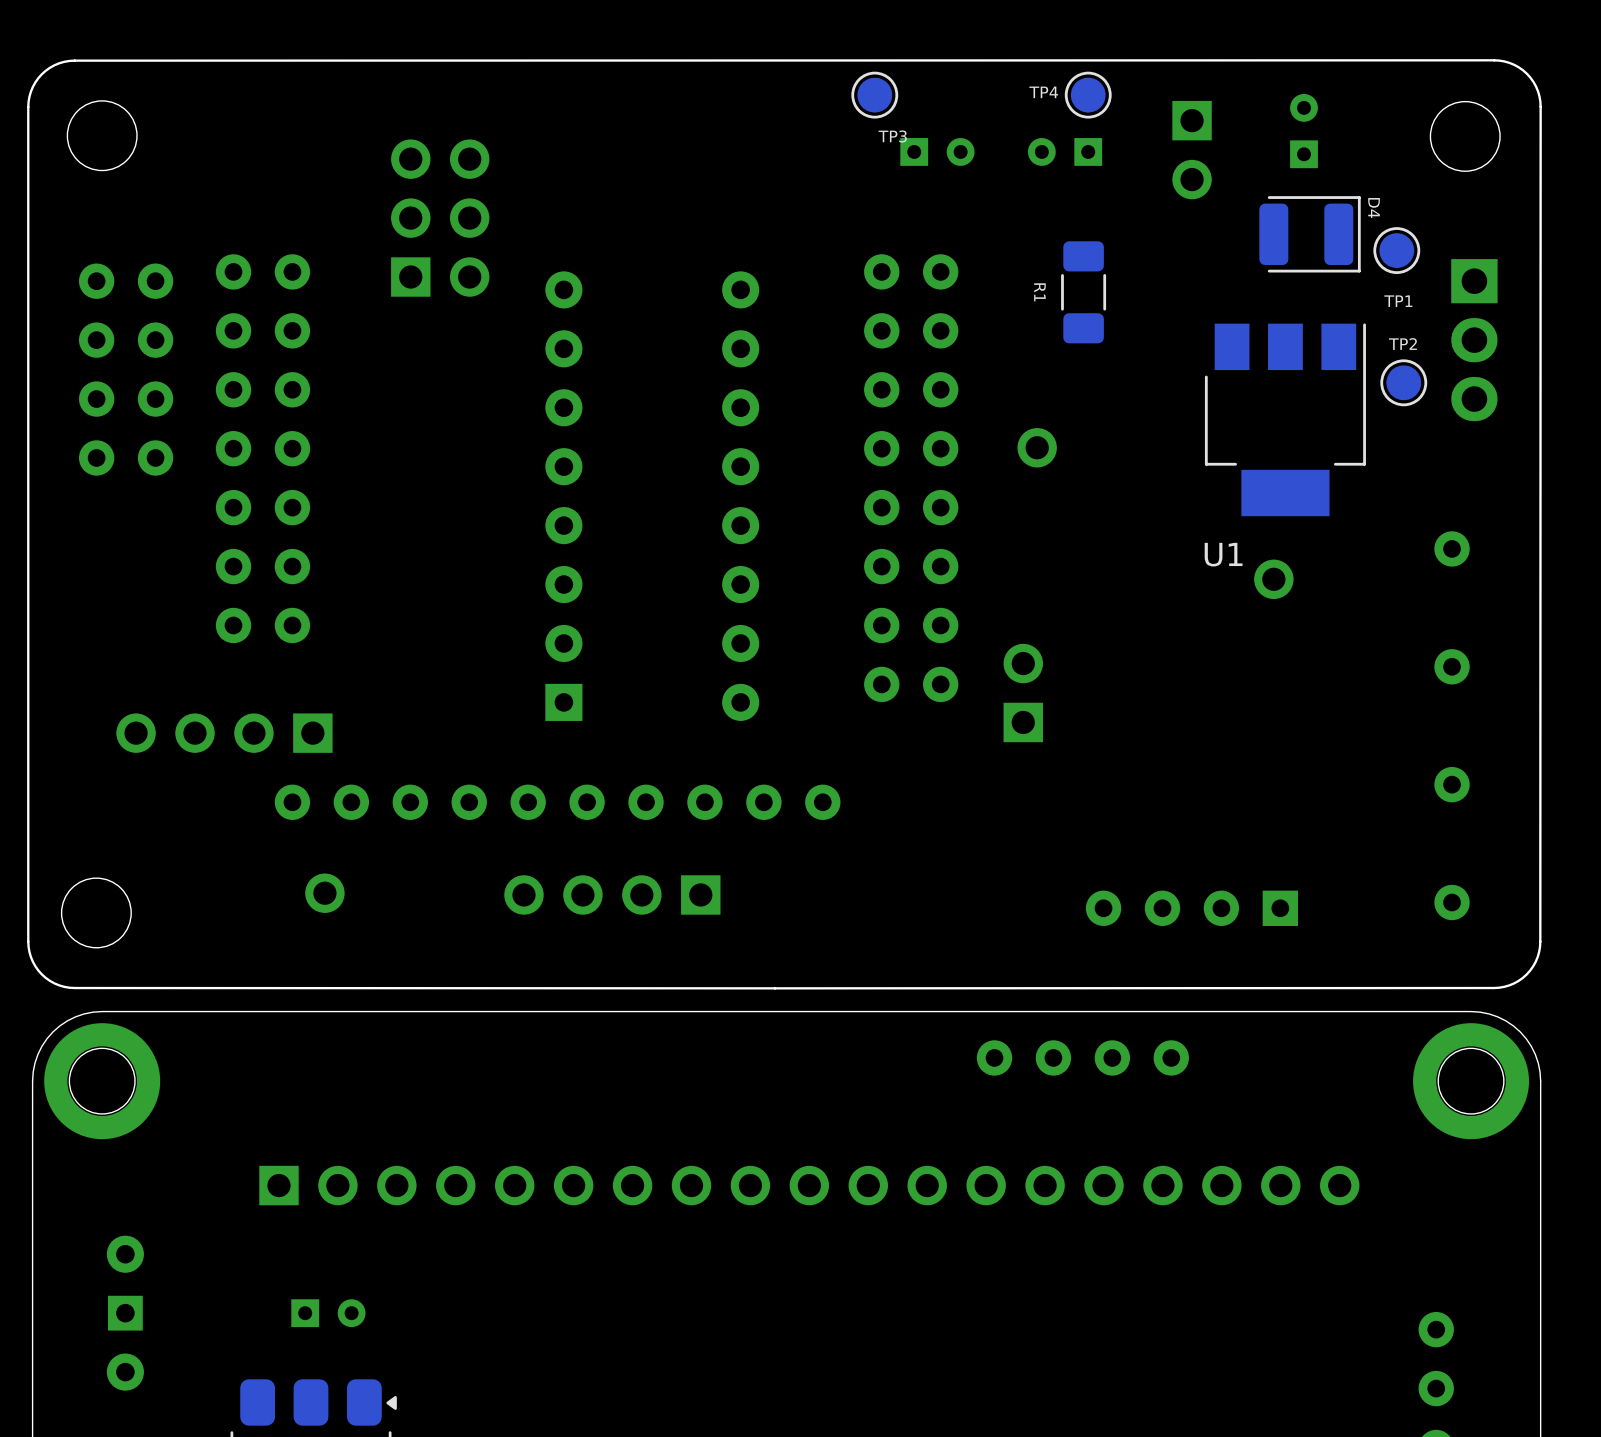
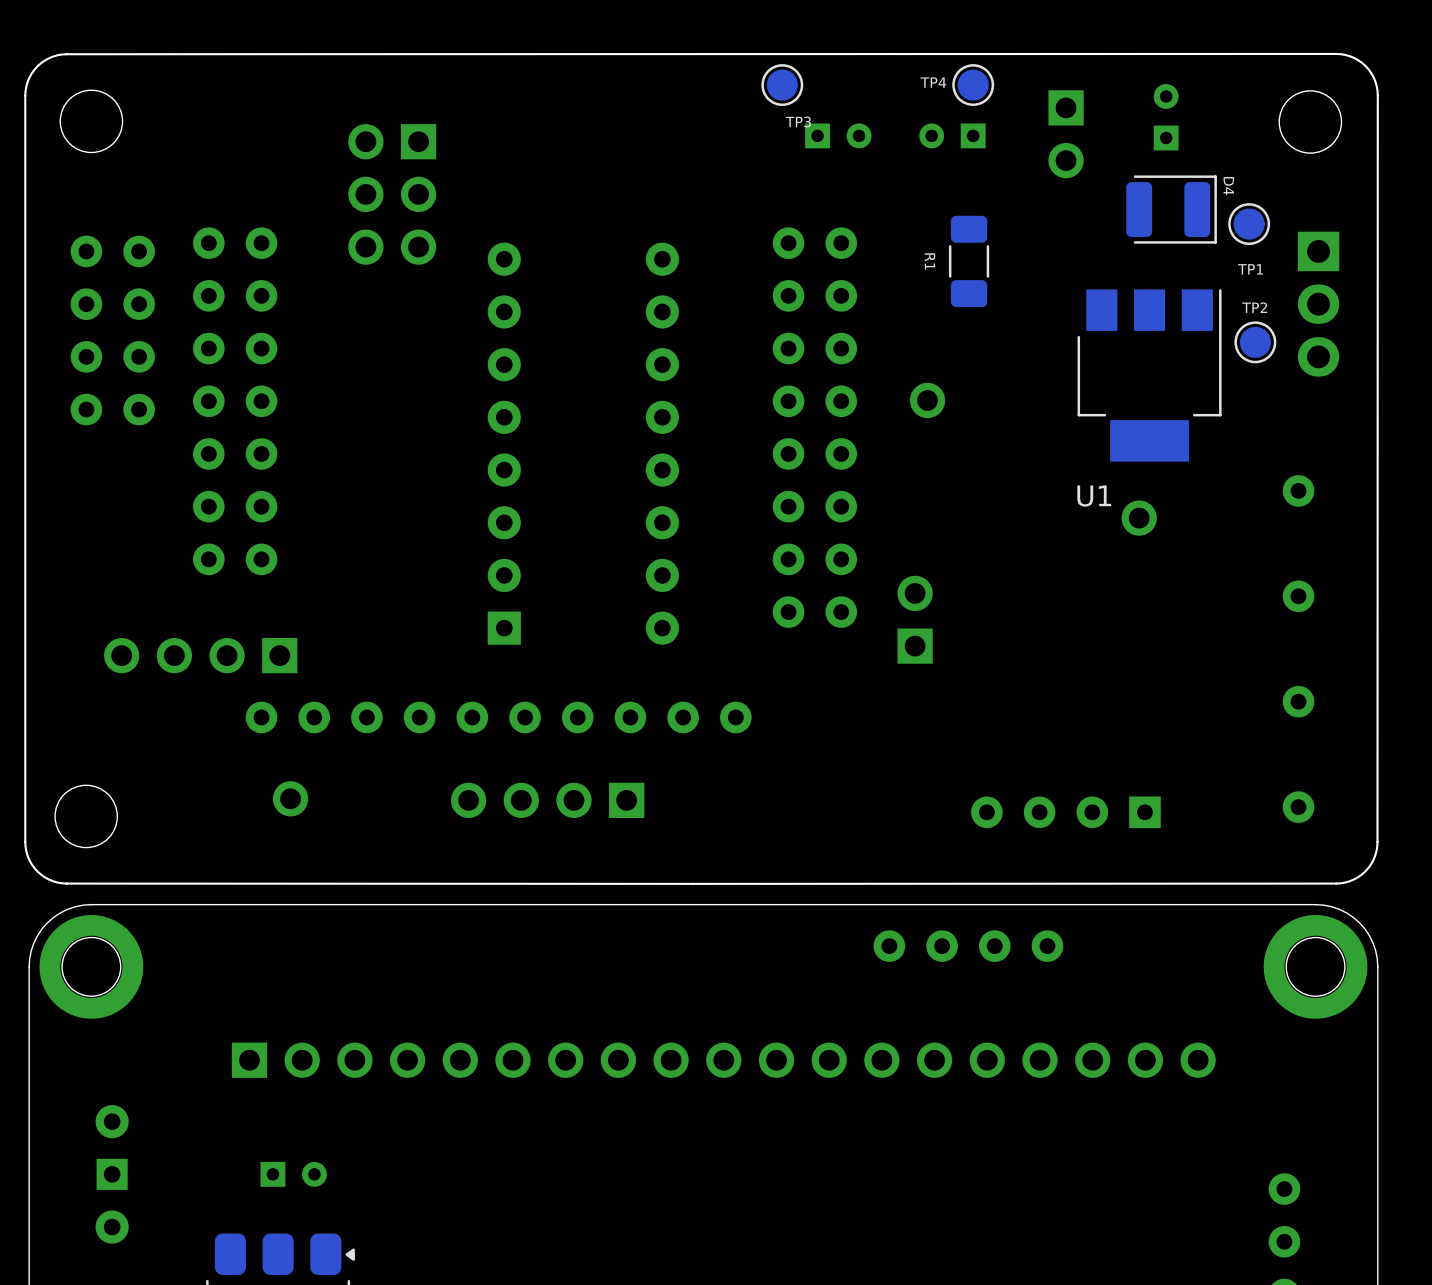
part rotation: 0° (440, 218) -> 180° (392, 194)

